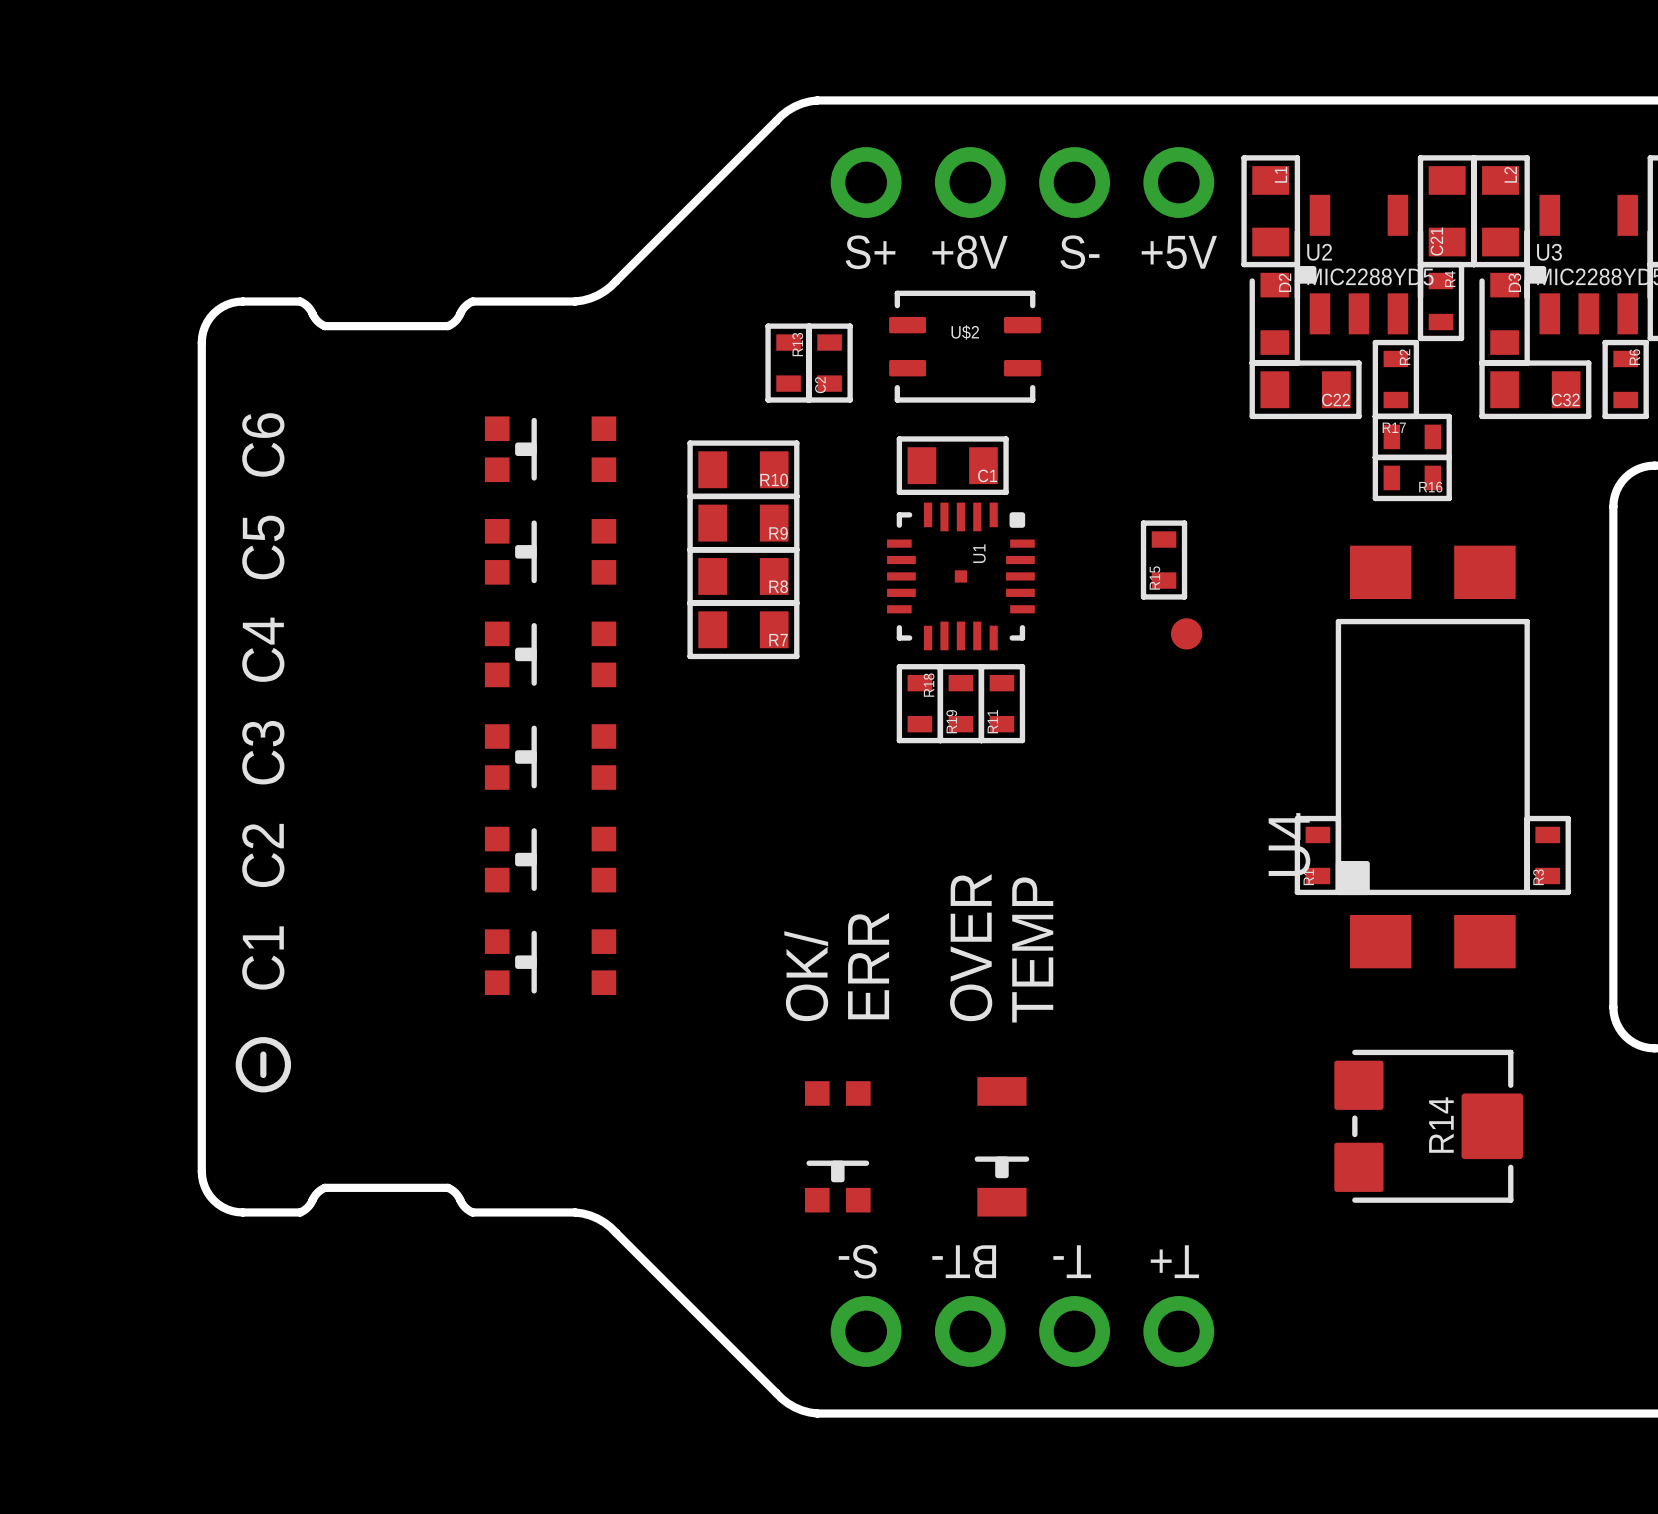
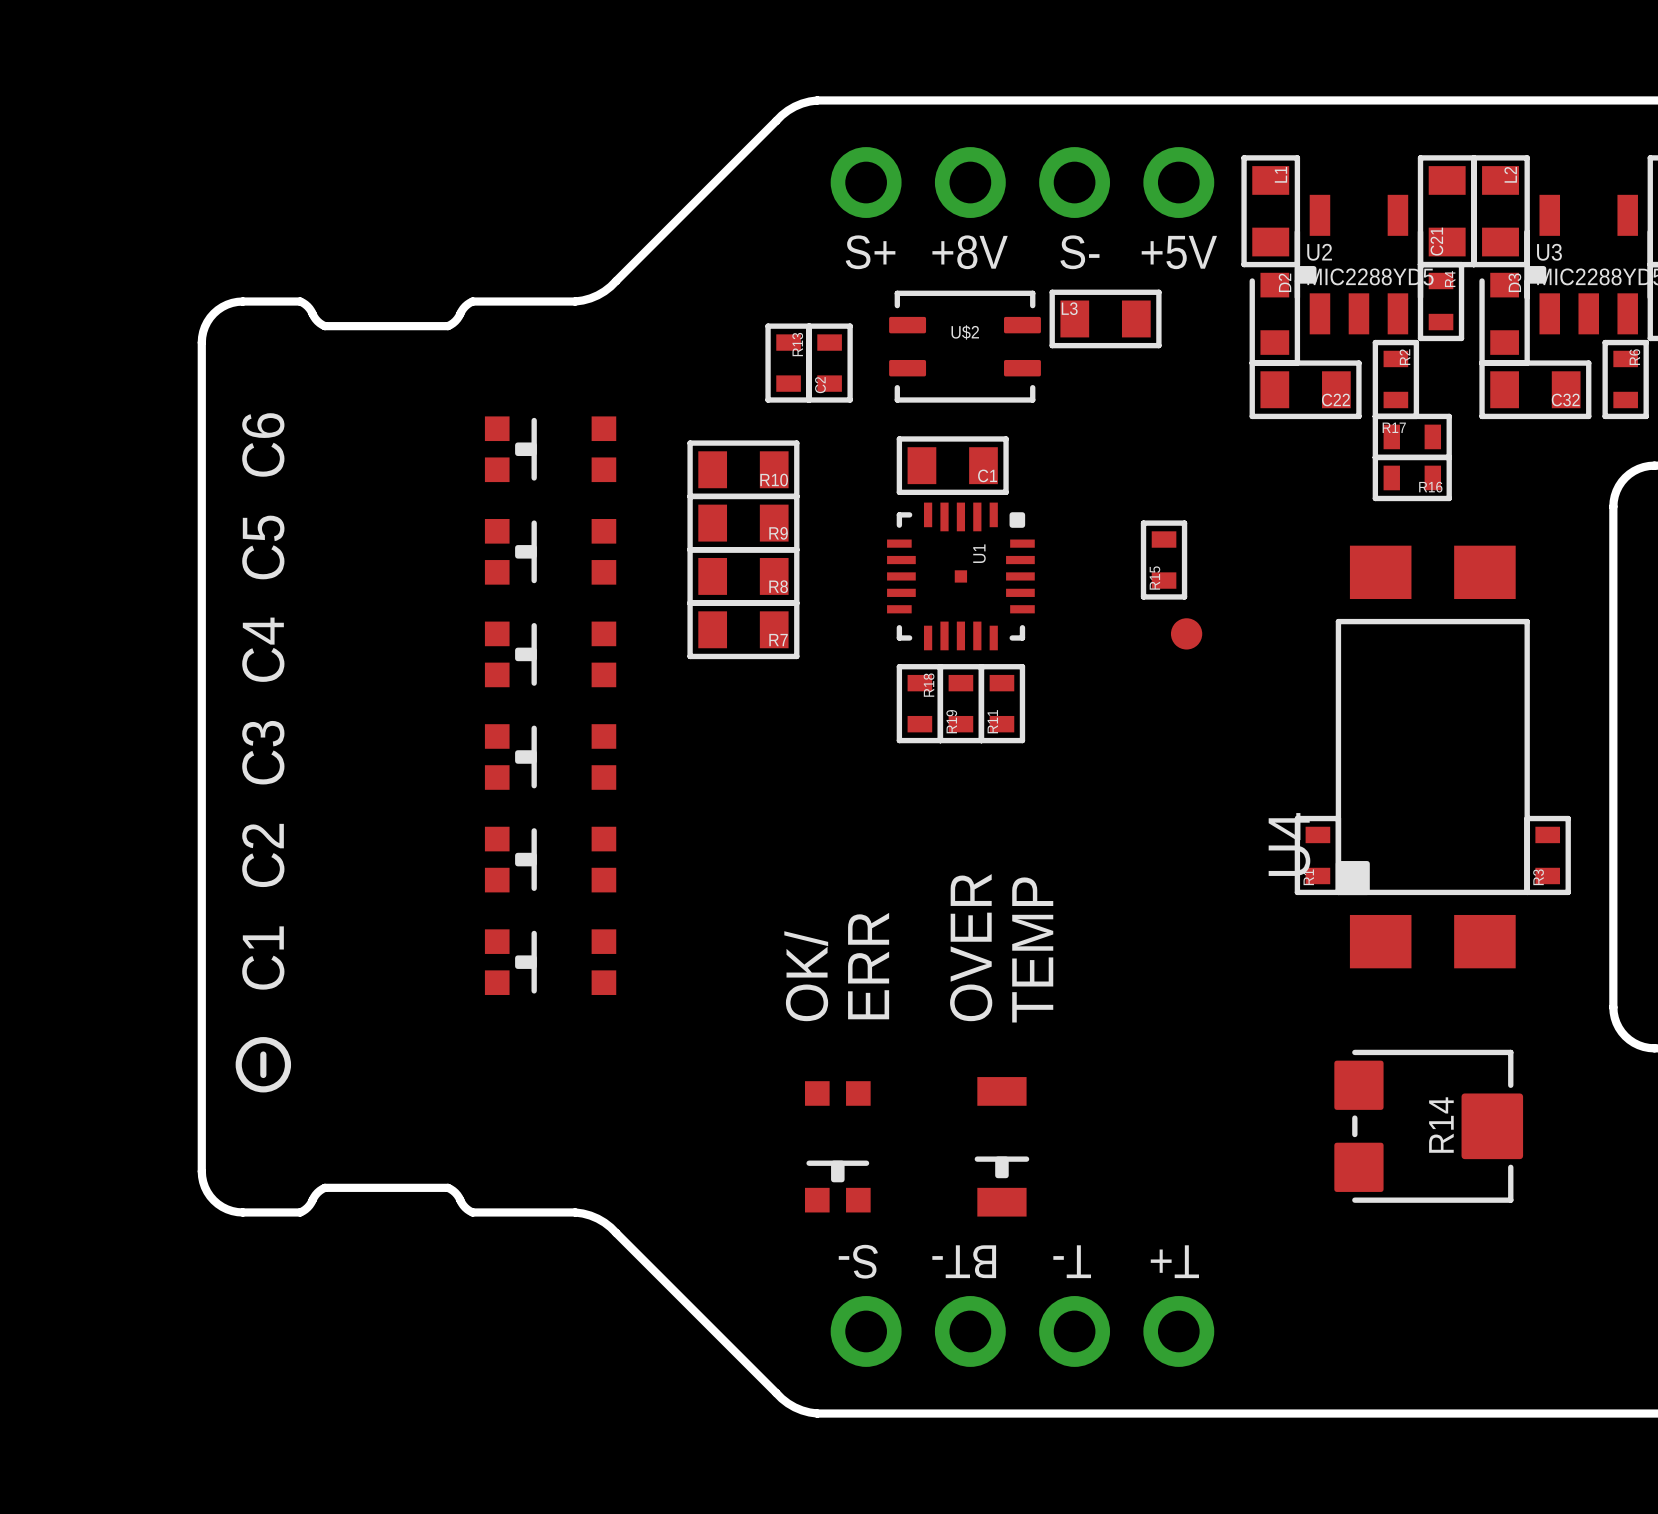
L3: none -> (1105, 318)

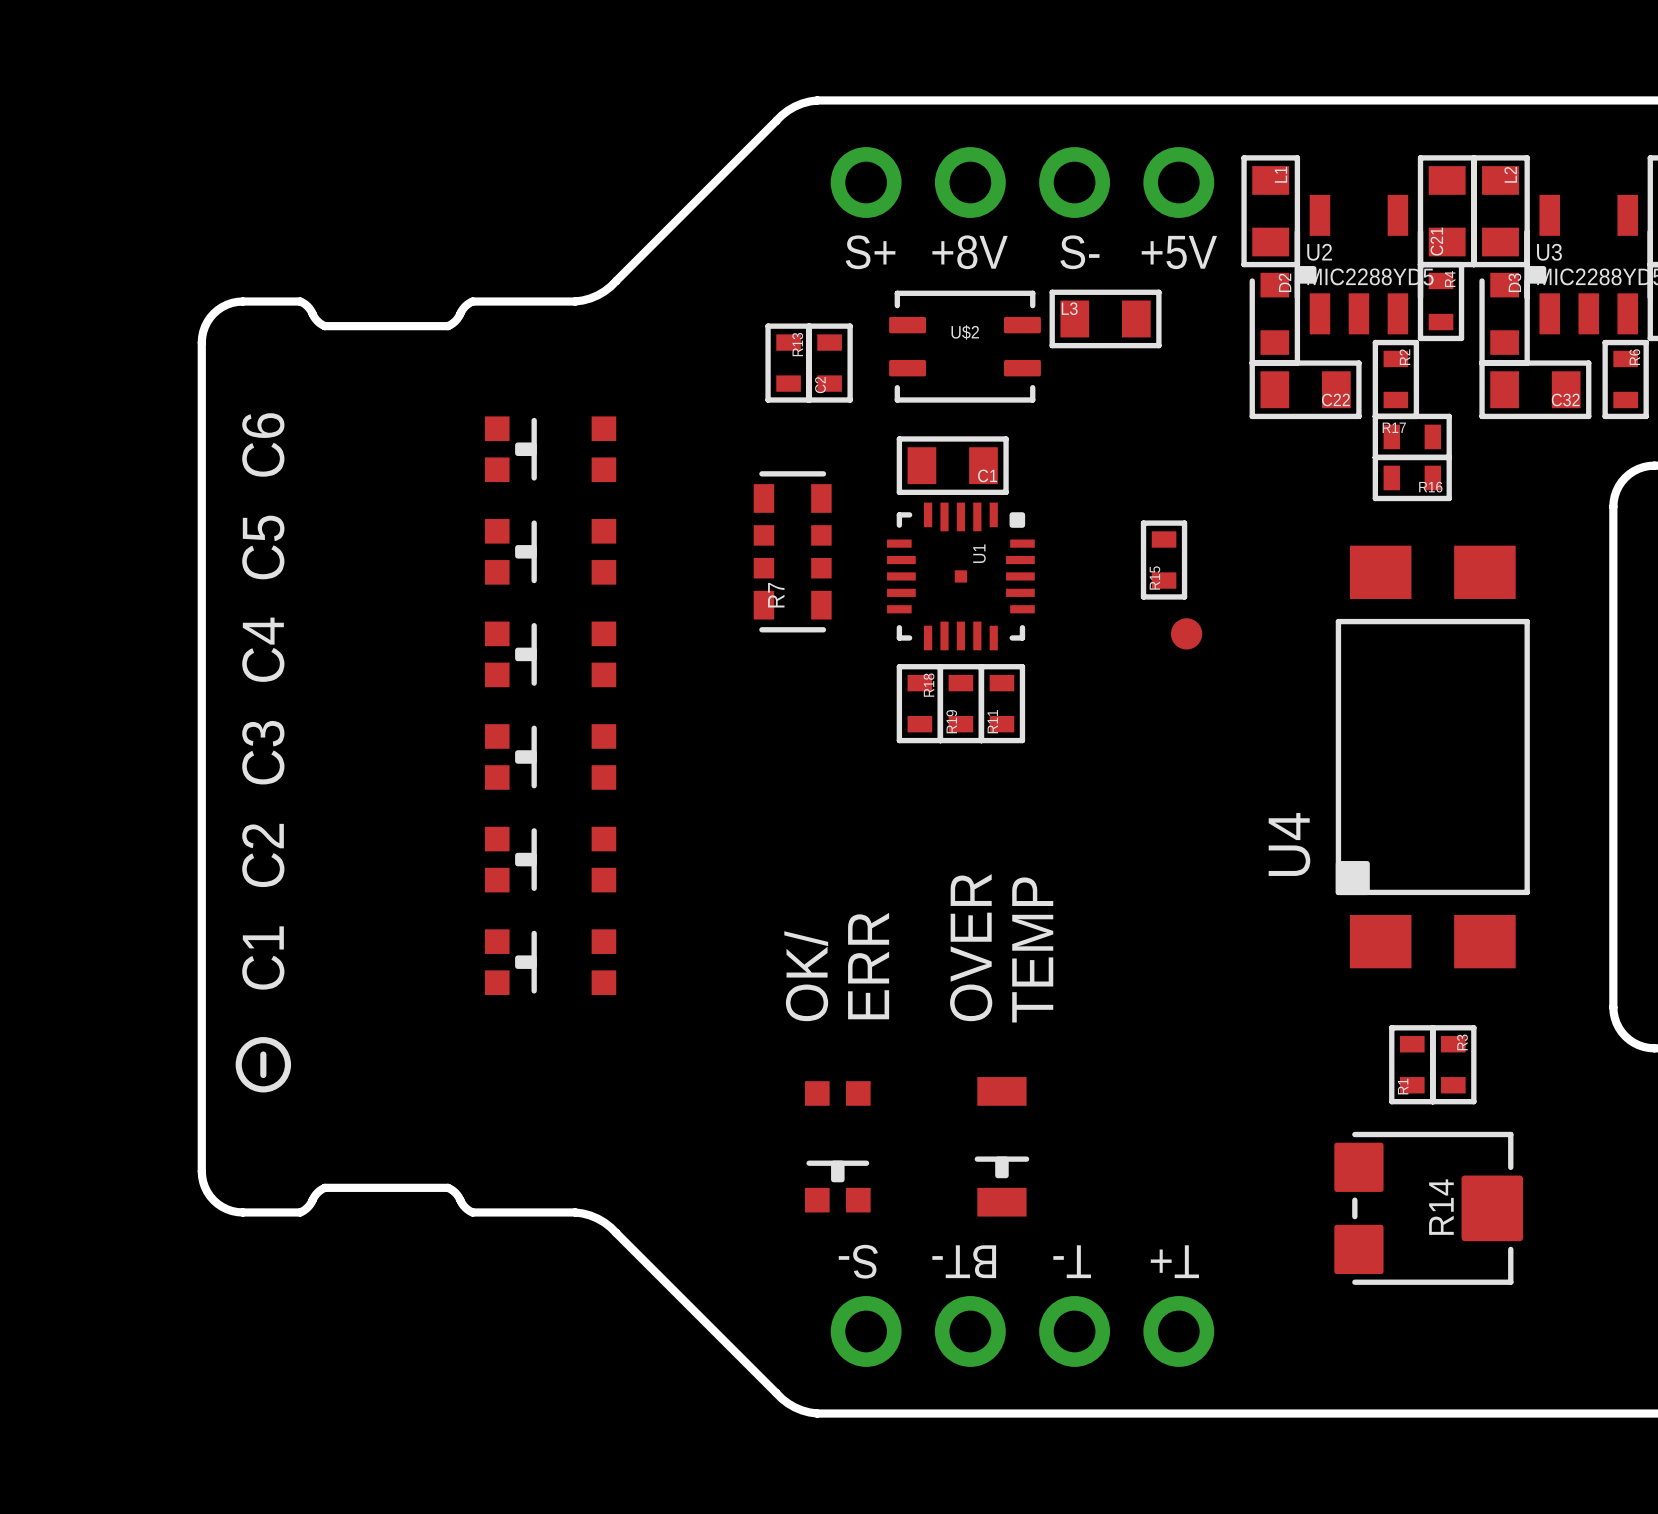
R10: (743, 469) -> none
R9: (743, 523) -> none
R8: (743, 576) -> none
R7 footprint: [687, 600, 800, 660] -> [753, 471, 832, 633]
R1 position: (1317, 855) -> (1412, 1064)
R3 position: (1547, 855) -> (1453, 1064)
R3 name position: R3 (1538, 877) -> R3 (1462, 1042)
R14 position: (1428, 1126) -> (1428, 1208)

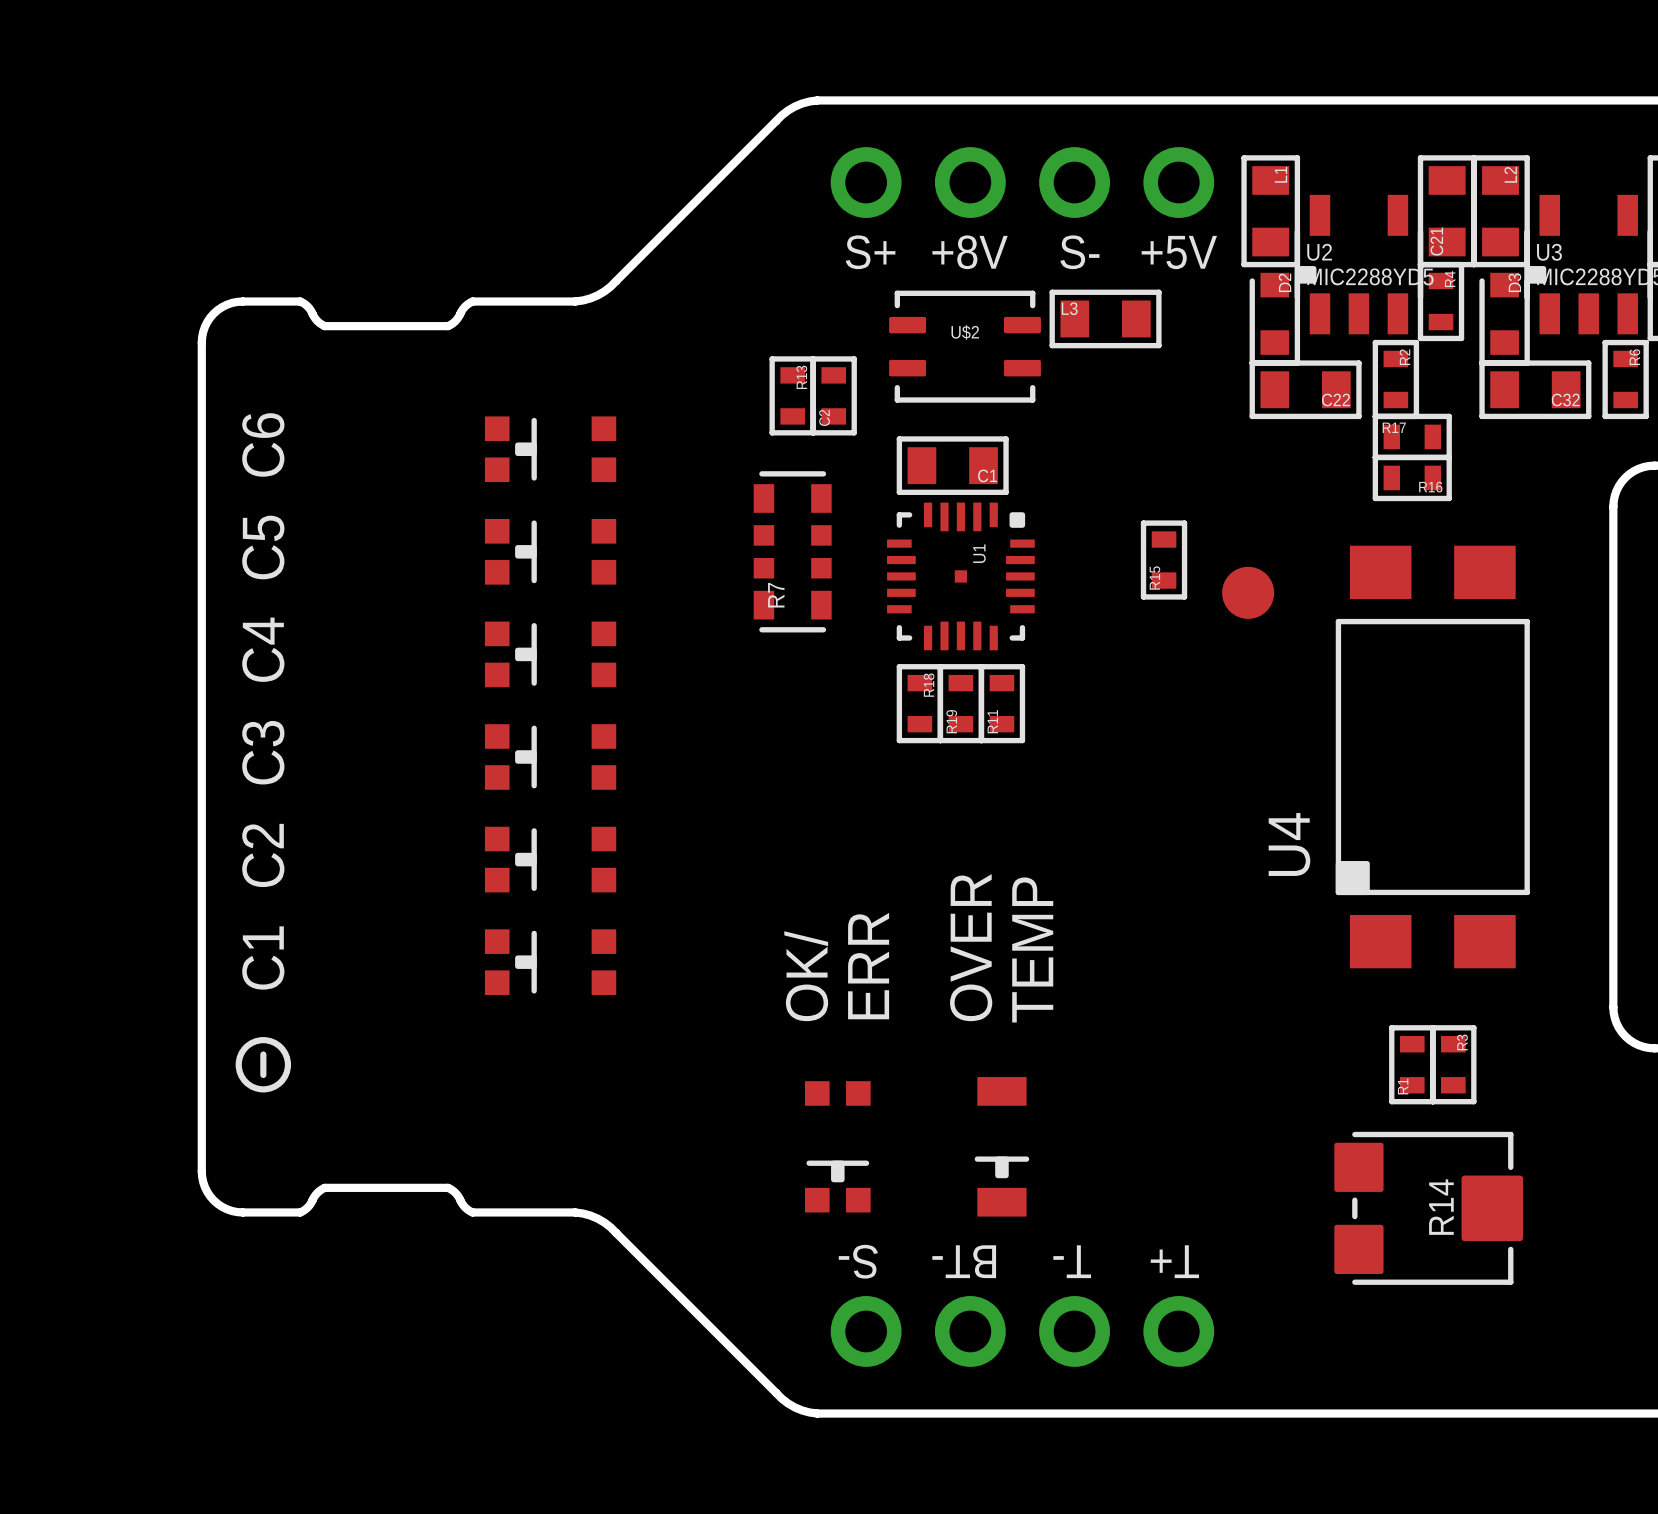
R13 position: (788, 363) -> (792, 395)
C2 position: (829, 363) -> (833, 395)
part: none -> (1248, 592)
part: (1186, 633) -> none

